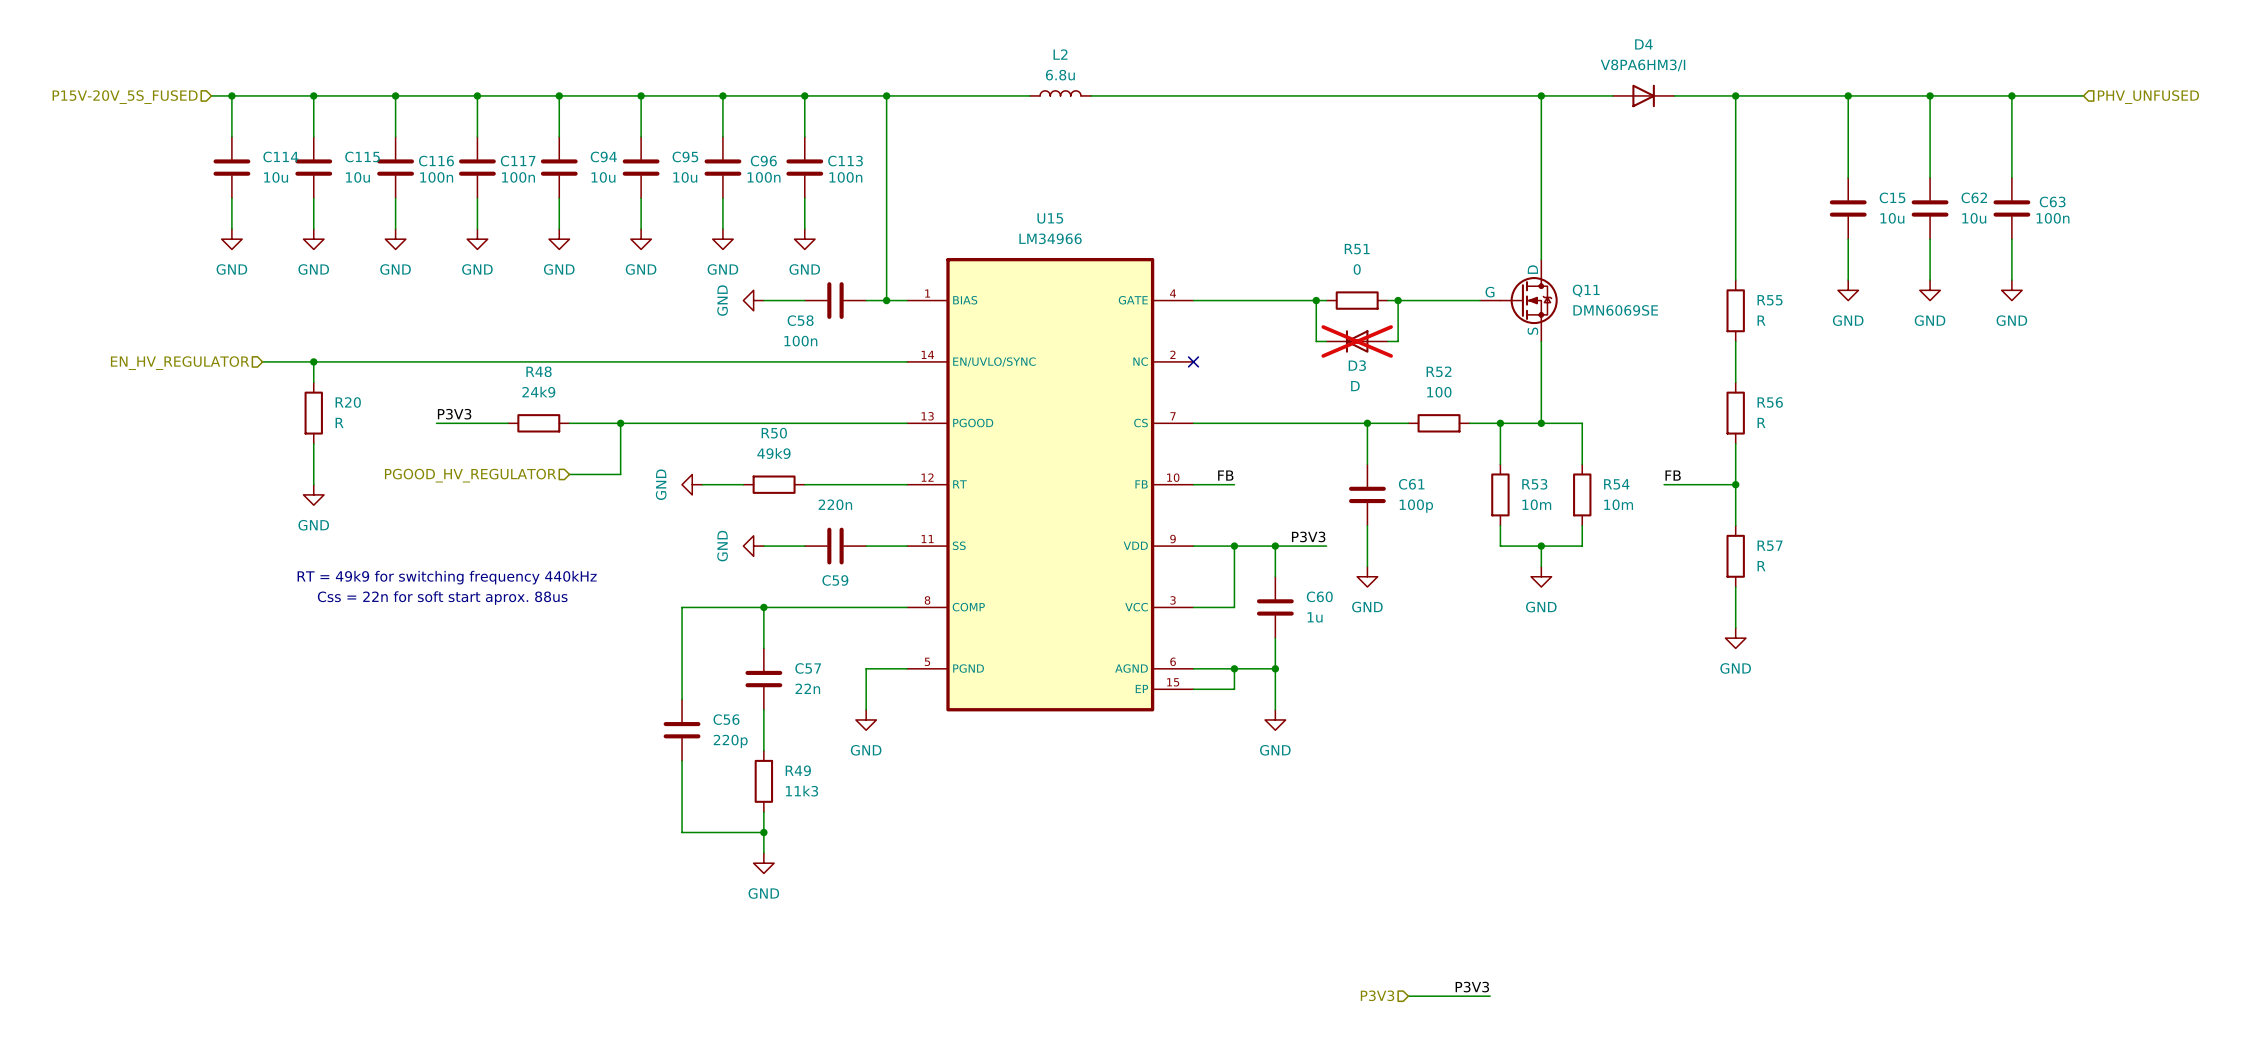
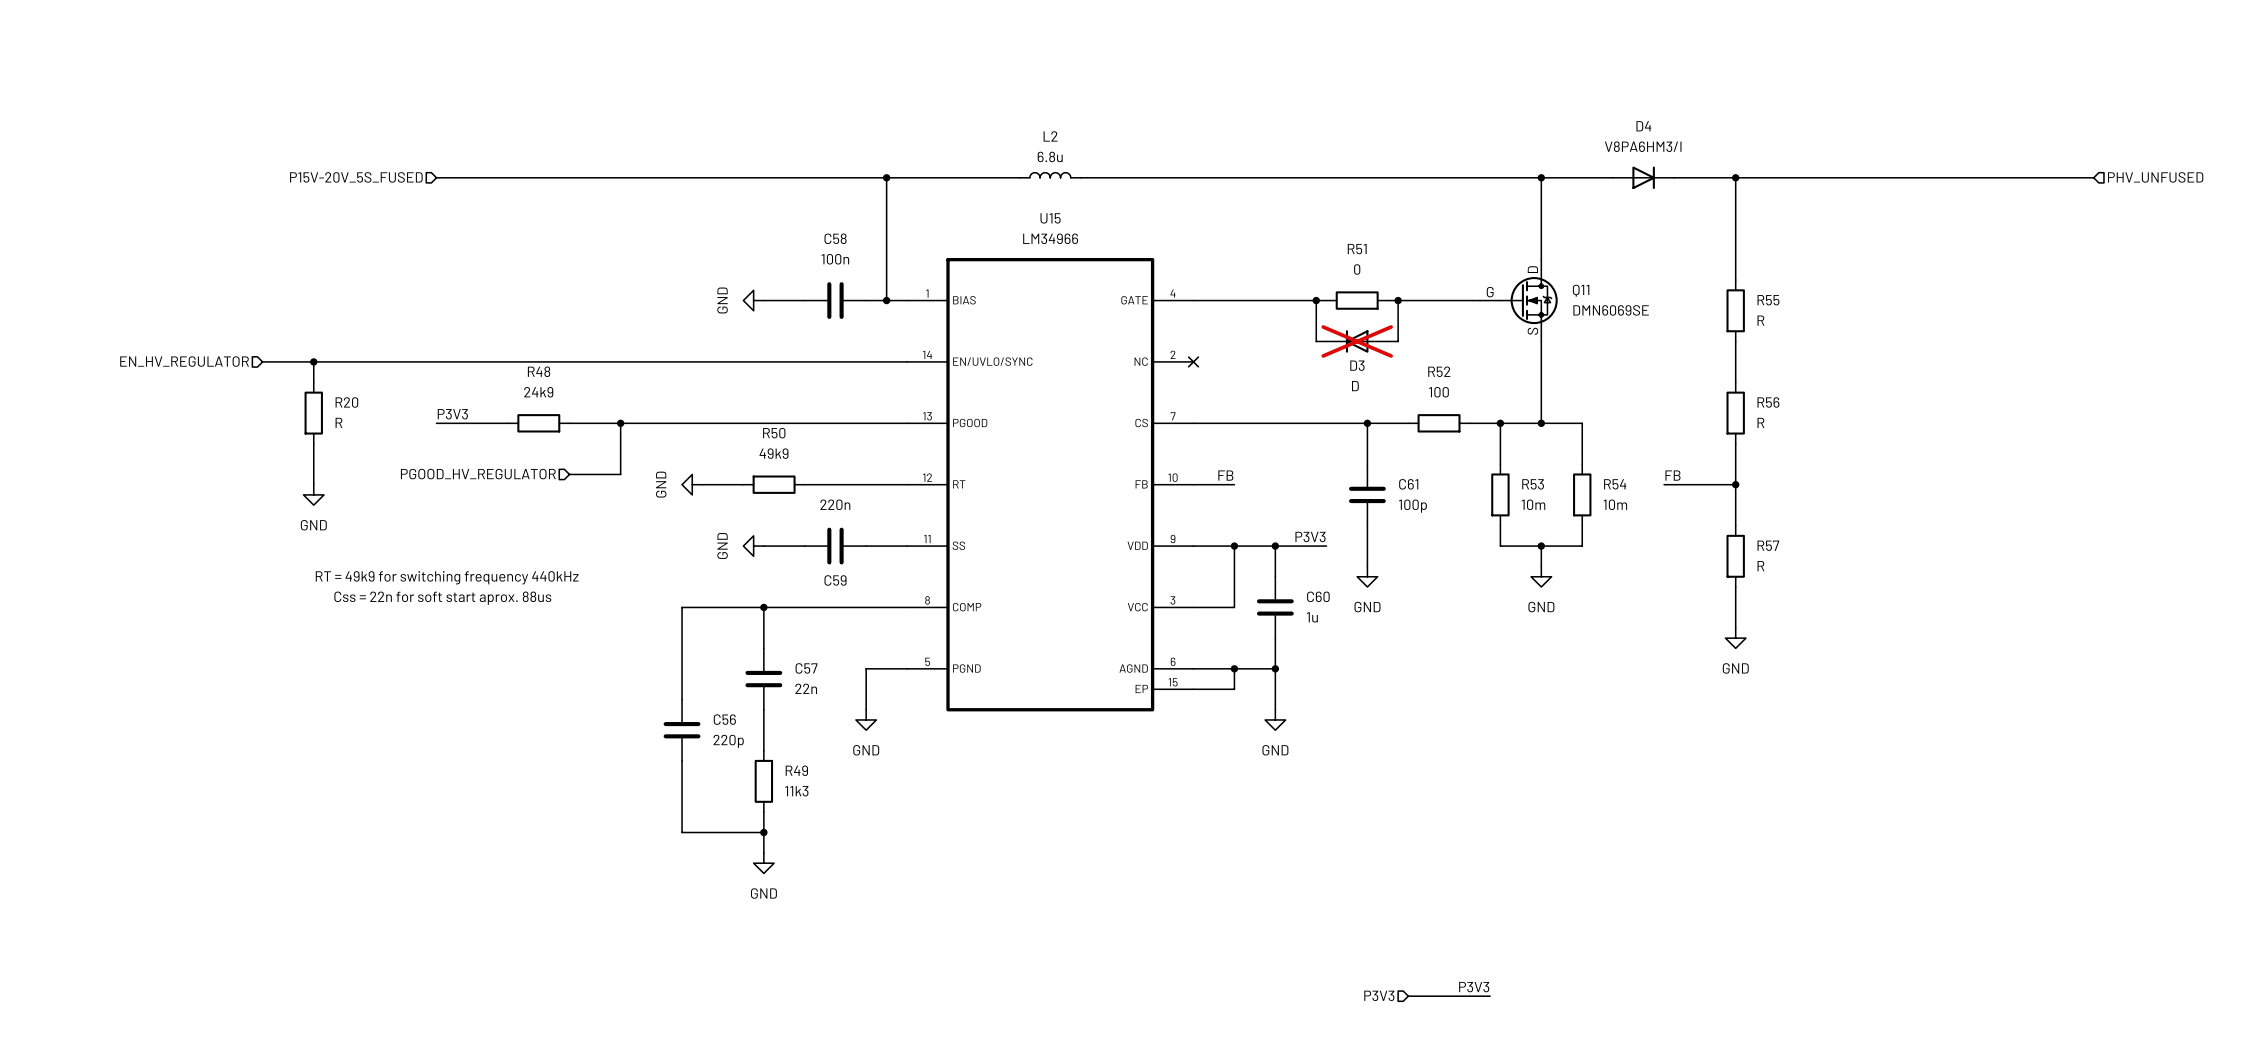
L2 position: (1060, 93) -> (1050, 175)
wire: (211, 95) (1029, 95) -> none
wire: (231, 95) (231, 136) -> none
junction: (231, 95) -> none
wire: (313, 95) (313, 136) -> none
junction: (313, 95) -> none
wire: (395, 95) (395, 136) -> none
junction: (395, 95) -> none
wire: (477, 95) (477, 136) -> none
junction: (477, 95) -> none
wire: (559, 95) (559, 136) -> none
junction: (559, 95) -> none
wire: (641, 95) (641, 136) -> none
junction: (641, 95) -> none
wire: (722, 95) (722, 136) -> none
junction: (722, 95) -> none
wire: (804, 95) (804, 136) -> none
junction: (804, 95) -> none
wire: (886, 95) (886, 177) -> none
junction: (886, 95) -> none
wire: (1091, 95) (1612, 95) -> none
wire: (1541, 95) (1541, 177) -> none
junction: (1541, 95) -> none
D4 position: (1643, 95) -> (1643, 177)
wire: (1674, 95) (2083, 95) -> none
wire: (1735, 95) (1735, 177) -> none
junction: (1735, 95) -> none
wire: (1848, 95) (1848, 177) -> none
junction: (1848, 95) -> none
wire: (1930, 95) (1930, 177) -> none
junction: (1930, 95) -> none
wire: (2011, 95) (2011, 177) -> none
junction: (2011, 95) -> none
hierarchical label: P15V-20V_5S_FUSED (125, 97) -> none
hierarchical label position: PHV_UNFUSED (2148, 97) -> PHV_UNFUSED (2155, 177)
C114: 10u (231, 167) -> none
C115: 10u (313, 167) -> none
C116: 100n (395, 167) -> none
C117: 100n (477, 167) -> none
C94: 10u (559, 167) -> none
C95: 10u (641, 167) -> none
C96: 100n (722, 167) -> none
C113: 100n (804, 167) -> none
wire: none -> (436, 177) (1019, 177)
junction: none -> (886, 177)
wire: none -> (1080, 177) (1612, 177)
junction: none -> (1541, 177)
wire: none -> (1674, 177) (2093, 177)
junction: none -> (1735, 177)
hierarchical label: none -> P15V-20V_5S_FUSED (356, 177)
wire: (231, 198) (231, 228) -> none
wire: (313, 198) (313, 228) -> none
wire: (395, 198) (395, 228) -> none
wire: (477, 198) (477, 228) -> none
wire: (559, 198) (559, 228) -> none
wire: (641, 198) (641, 228) -> none
wire: (722, 198) (722, 228) -> none
wire: (804, 198) (804, 228) -> none
C15: 10u (1848, 208) -> none
C62: 10u (1930, 208) -> none
C63: 100n (2011, 208) -> none
power symbol: GND (231, 239) -> none
power symbol: GND (313, 239) -> none
power symbol: GND (395, 239) -> none
power symbol: GND (477, 239) -> none
power symbol: GND (559, 239) -> none
power symbol: GND (641, 239) -> none
power symbol: GND (722, 239) -> none
power symbol: GND (804, 239) -> none
wire: (1848, 239) (1848, 280) -> none
wire: (1930, 239) (1930, 280) -> none
wire: (2011, 239) (2011, 280) -> none
power symbol: GND (1848, 290) -> none
power symbol: GND (1930, 290) -> none
power symbol: GND (2011, 290) -> none
C58 name position: C58 (800, 320) -> C58 (835, 238)
C58 value position: 100n (800, 341) -> 100n (835, 259)

